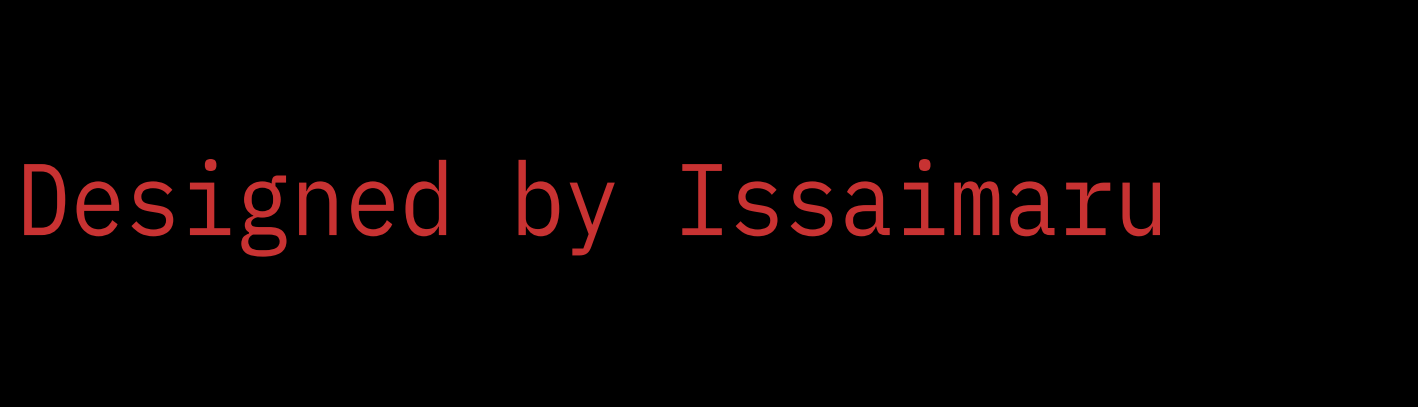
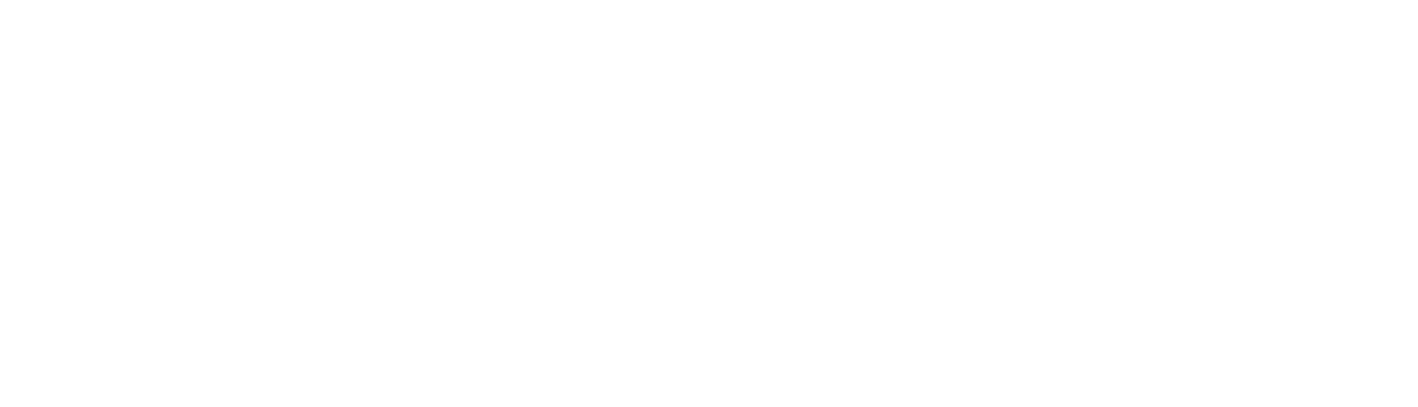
text: Designed by Issaimaru (592, 207) -> none

